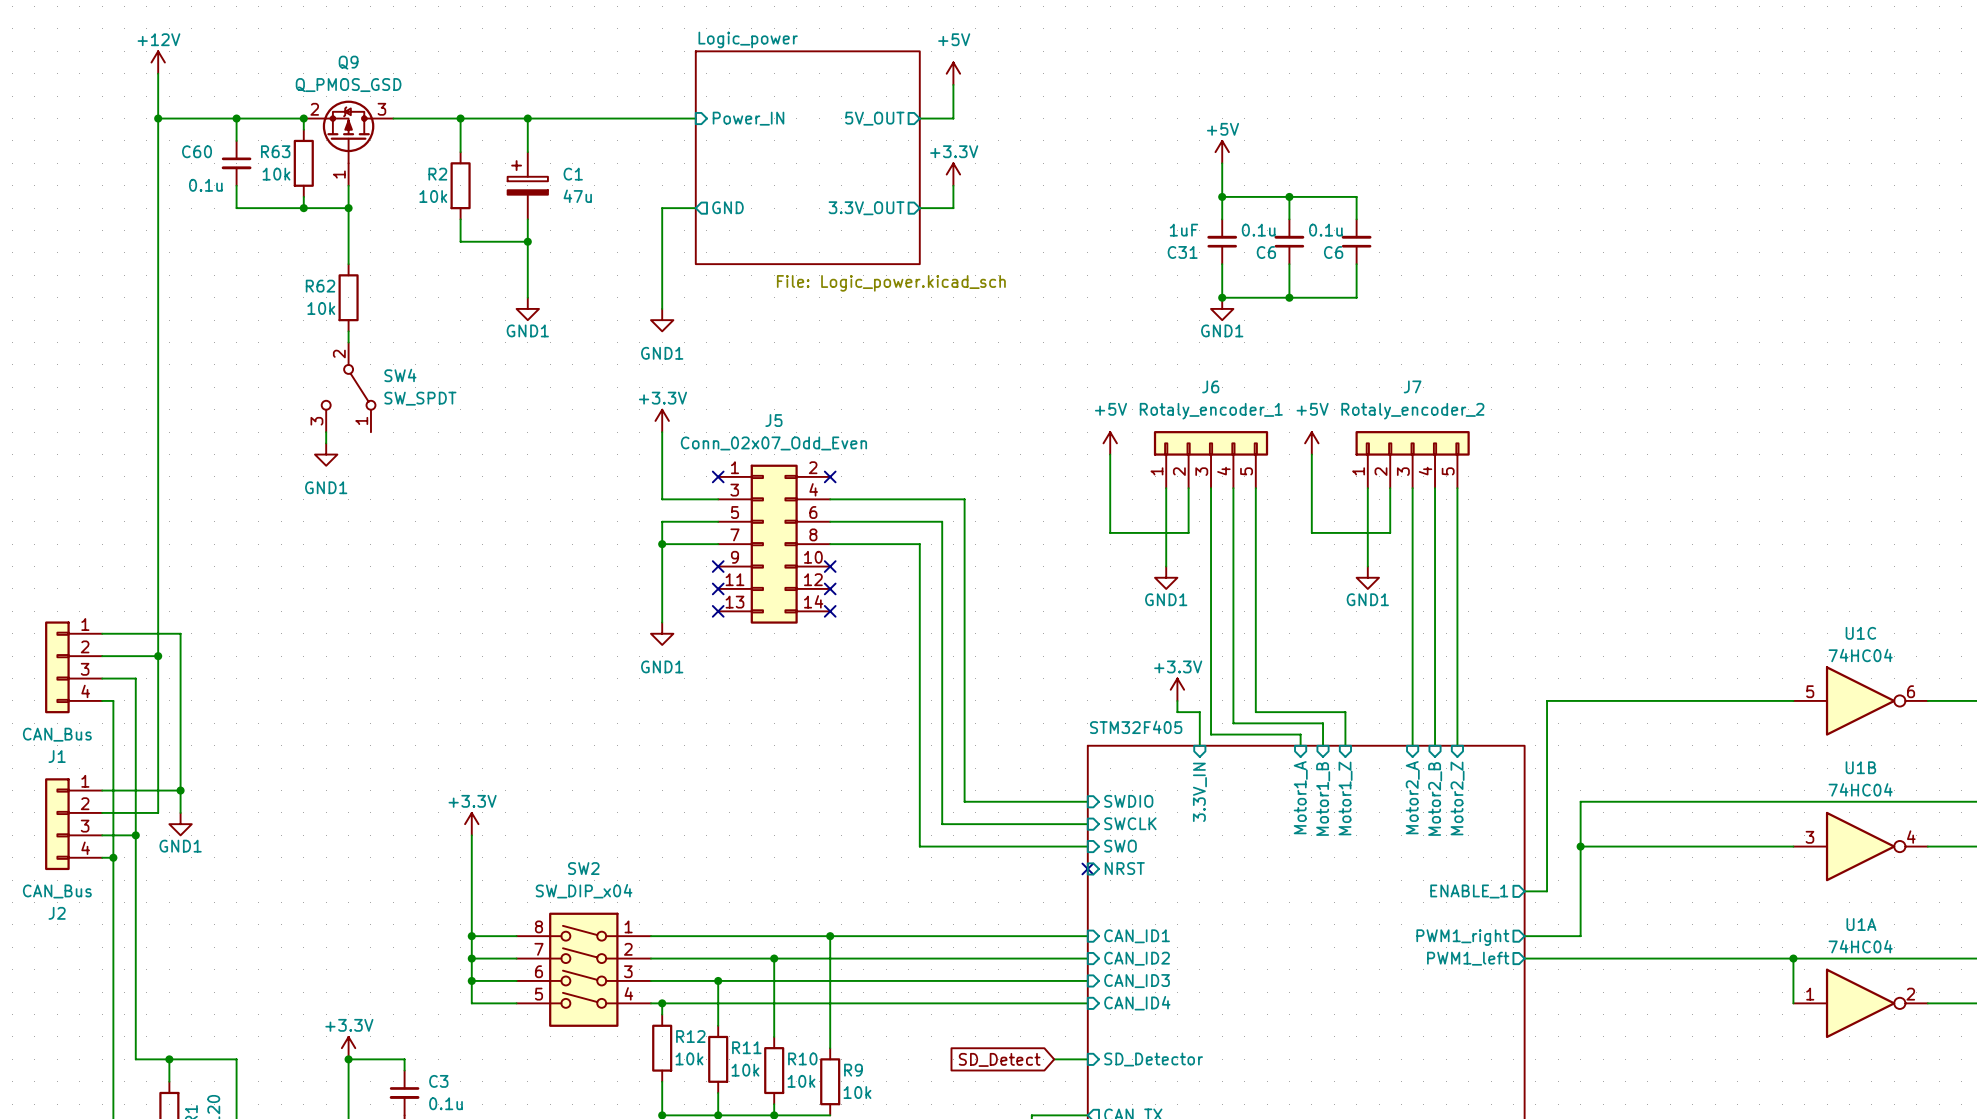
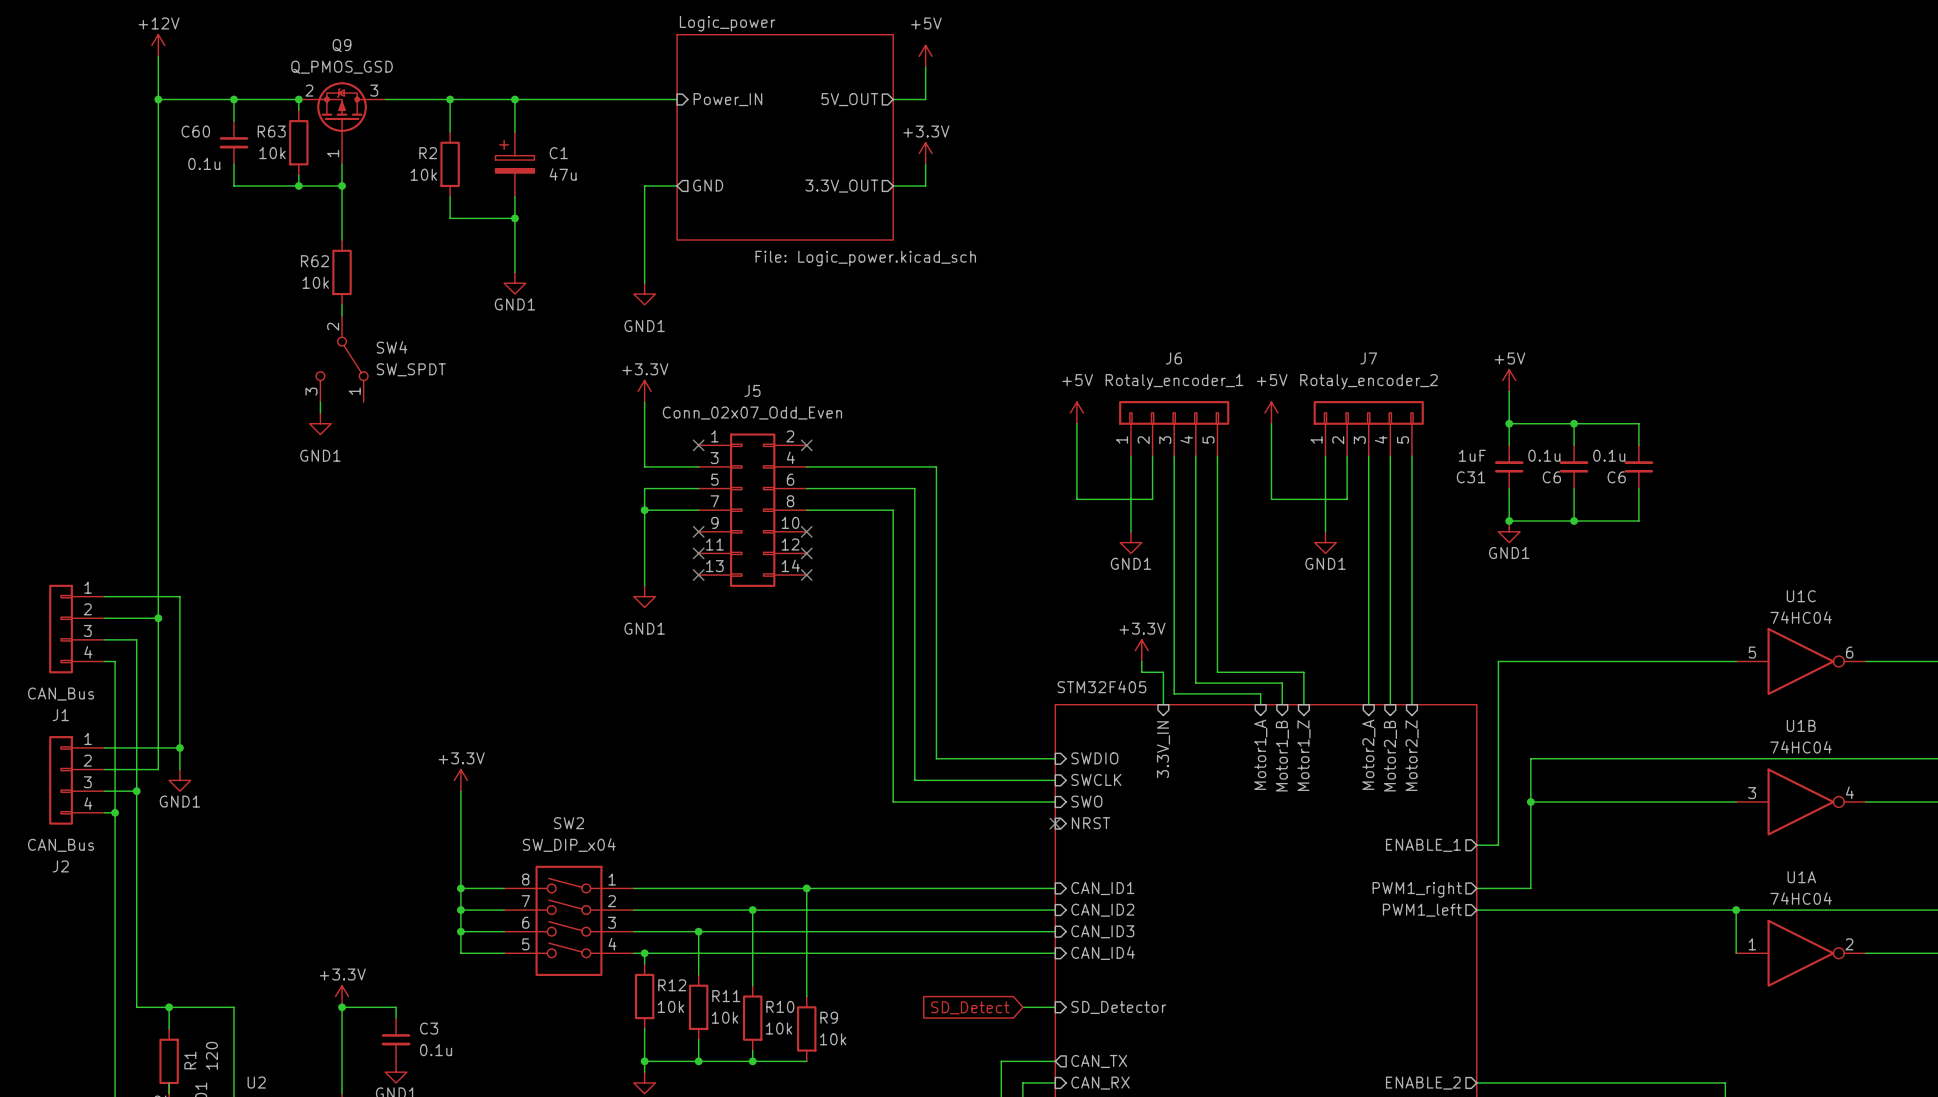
power symbol: +5V (1222, 152) -> none
wire: (1222, 163) (1222, 219) -> none
wire: (1222, 196) (1356, 196) (1356, 219) -> none
junction: (1222, 196) -> none
wire: (1289, 196) (1289, 219) -> none
junction: (1289, 196) -> none
C31 position: (1222, 241) -> (1509, 466)
C6: 0.1u (1289, 241) -> none
C6: 0.1u (1356, 241) -> none
wire: (1222, 264) (1222, 297) (1356, 297) (1356, 264) -> none
wire: (1289, 264) (1289, 297) -> none
junction: (1222, 297) -> none
junction: (1289, 297) -> none
power symbol: GND1 (1222, 308) -> none
power symbol: none -> +5V (1509, 380)
wire: none -> (1509, 391) (1509, 445)
wire: none -> (1509, 423) (1638, 423) (1638, 445)
junction: none -> (1509, 423)
wire: none -> (1574, 423) (1574, 445)
junction: none -> (1574, 423)
C6: none -> 0.1u (1574, 466)
C6: none -> 0.1u (1638, 466)
wire: none -> (1509, 488) (1509, 521) (1638, 521) (1638, 488)
wire: none -> (1574, 488) (1574, 521)
junction: none -> (1509, 521)
junction: none -> (1574, 521)
power symbol: none -> GND1 (1509, 531)

